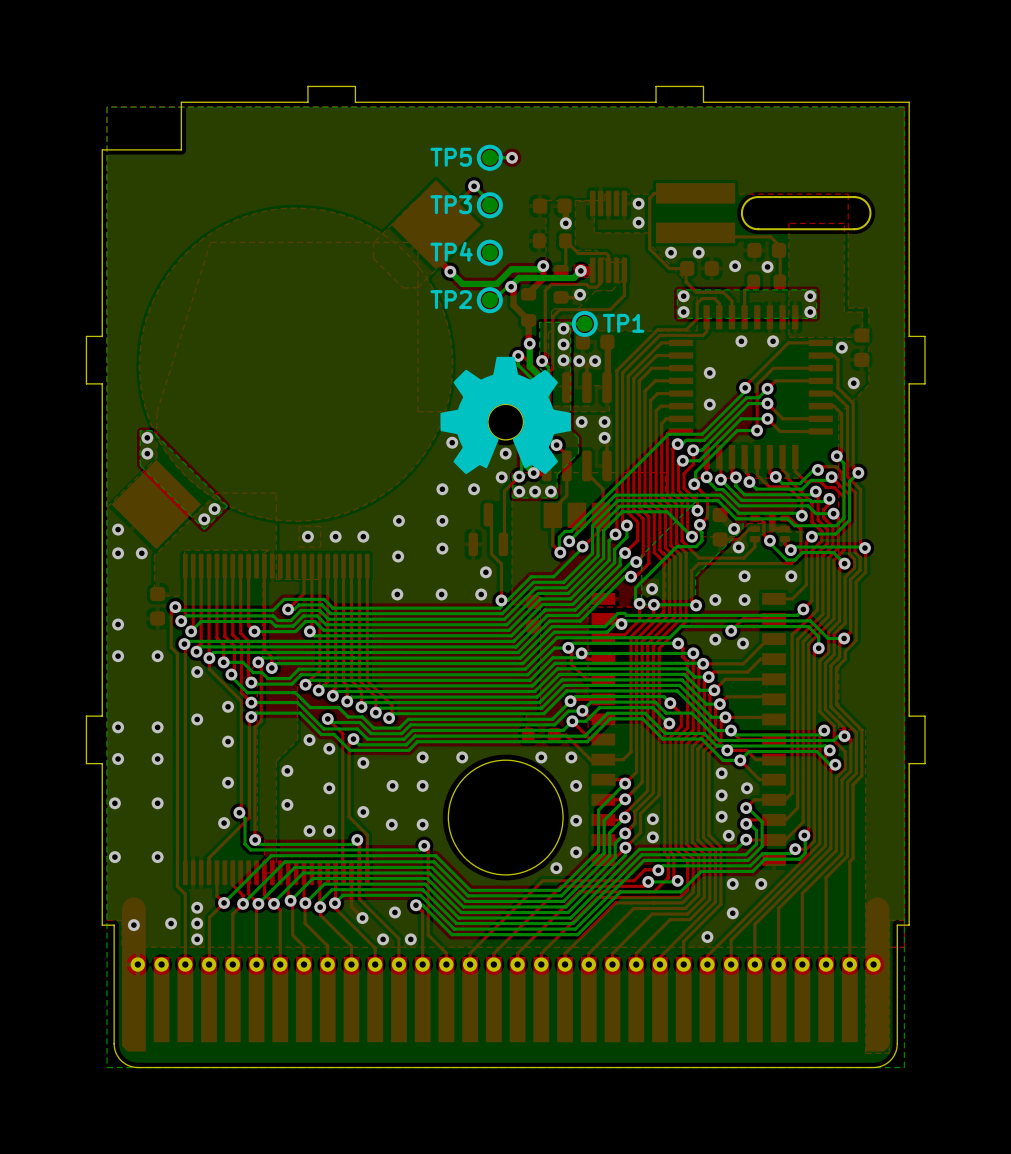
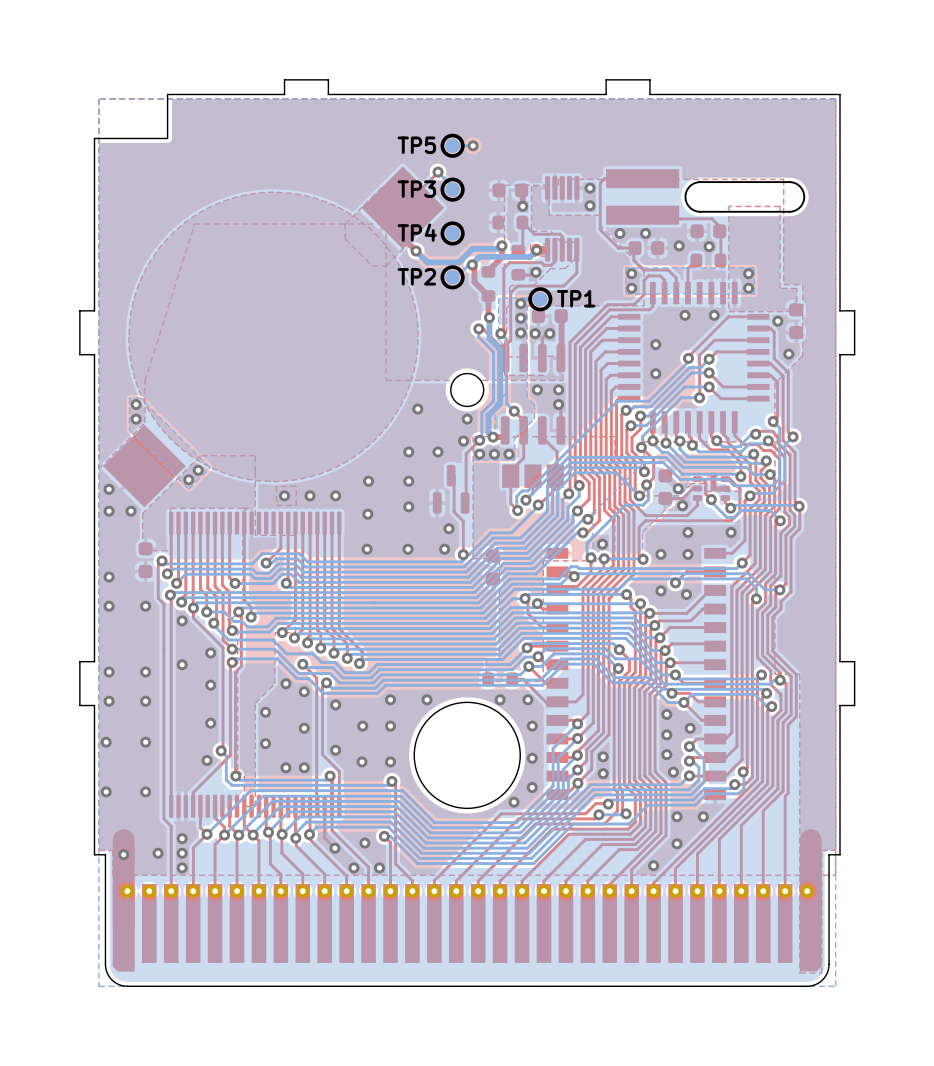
drawing: [440, 356, 571, 475] -> none

